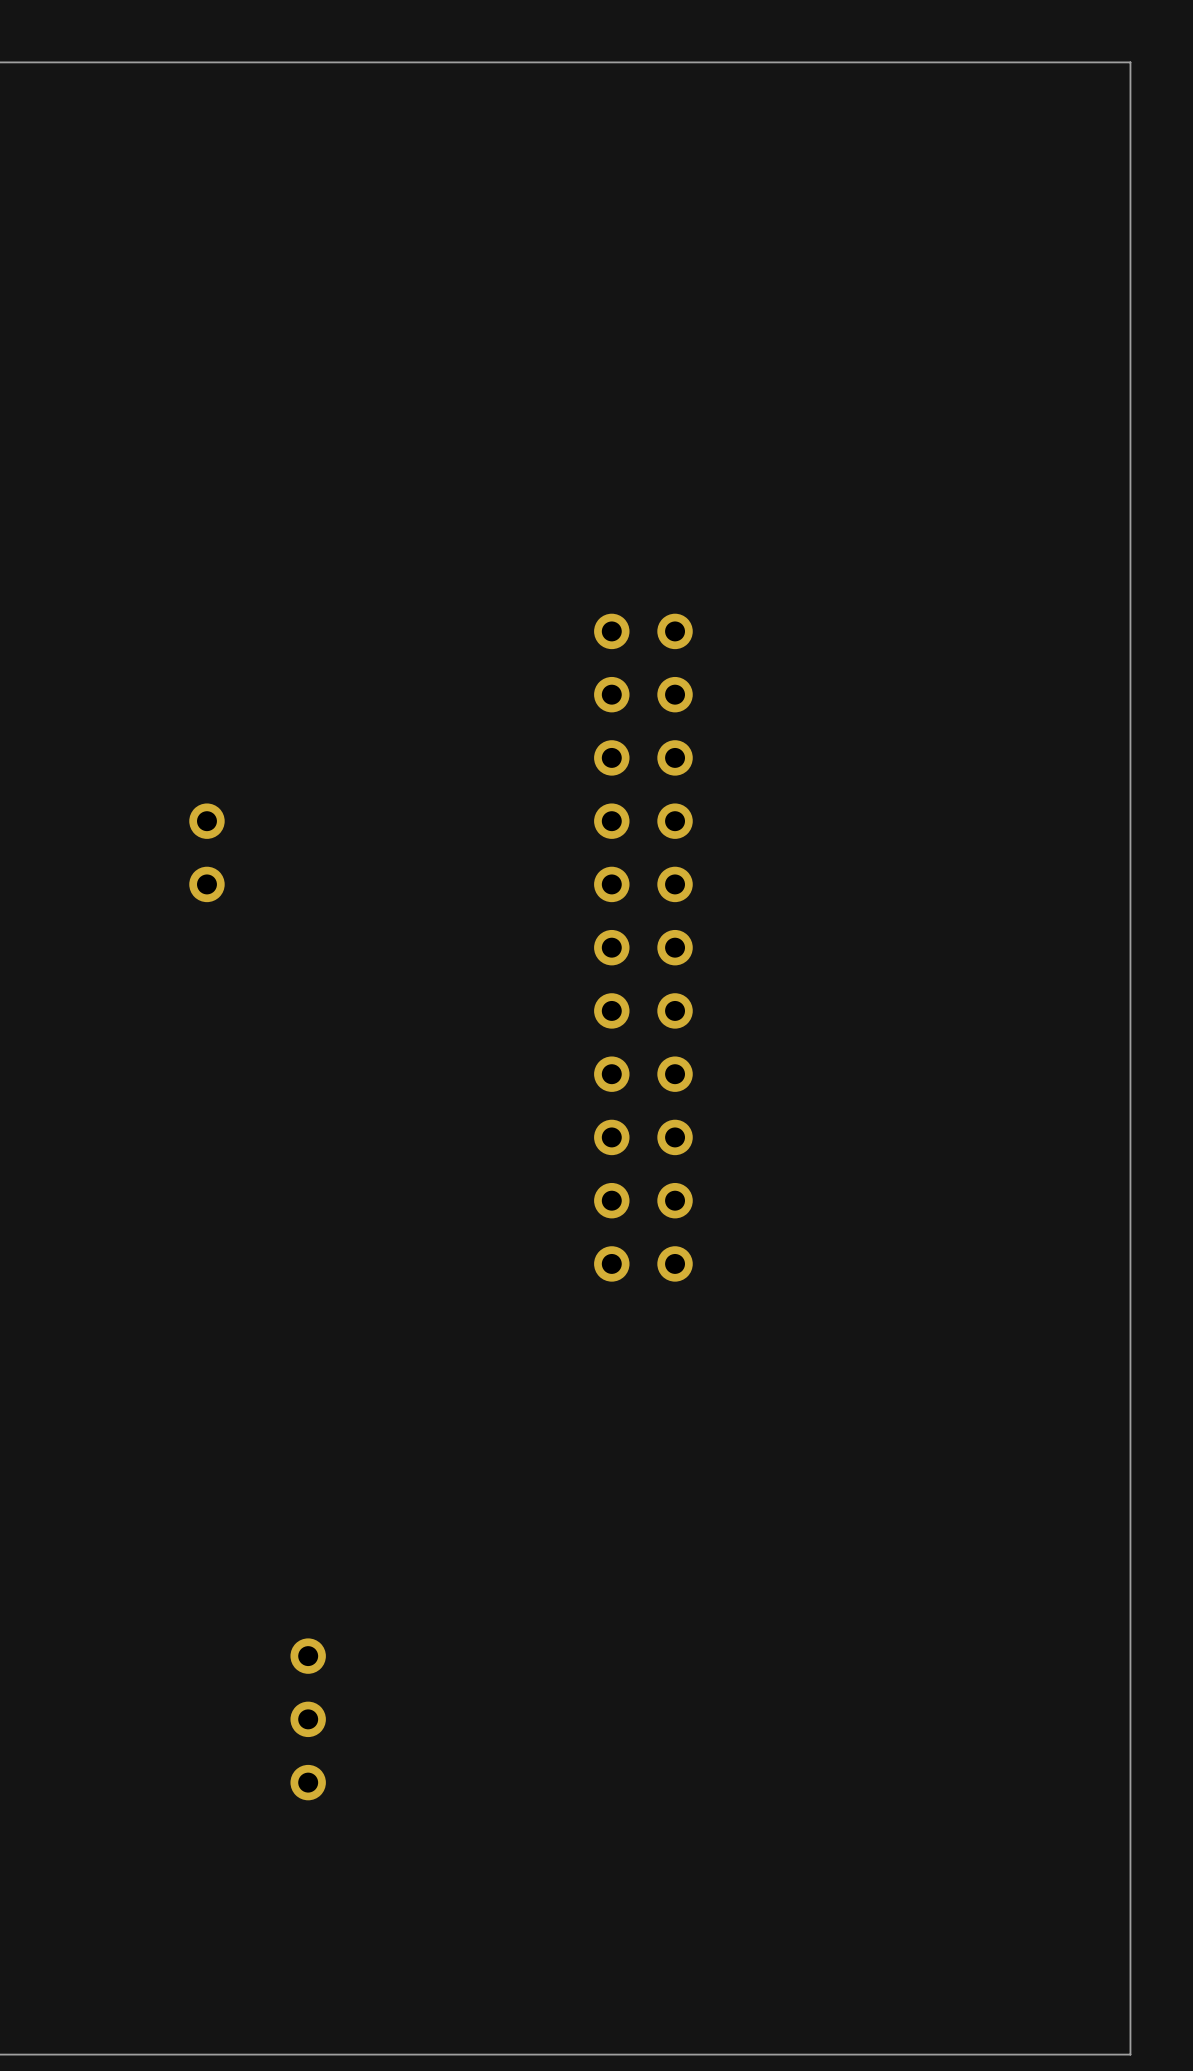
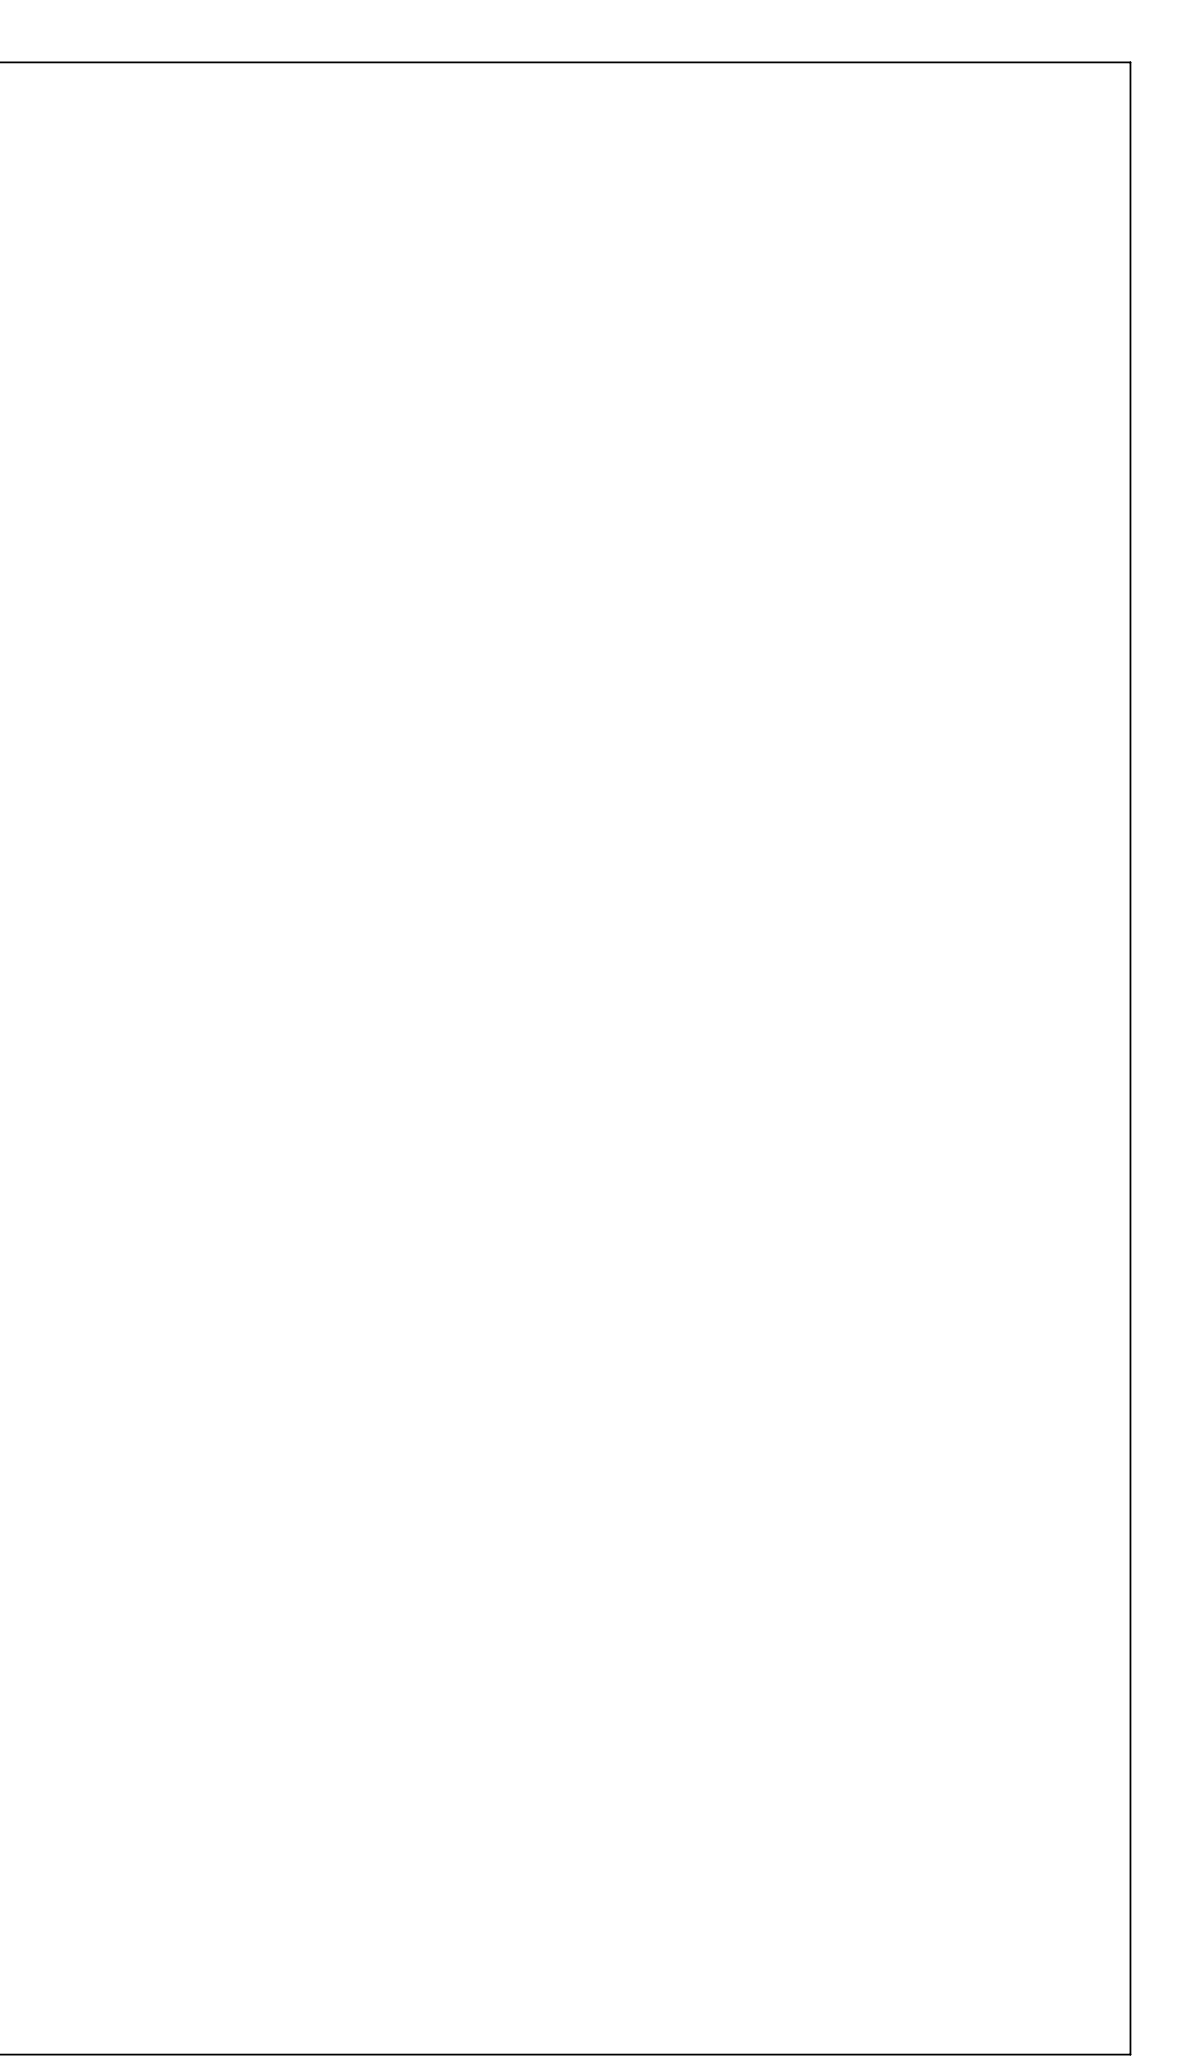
part: (206, 852) -> none
part: (611, 947) -> none
part: (675, 947) -> none
part: (308, 1719) -> none

